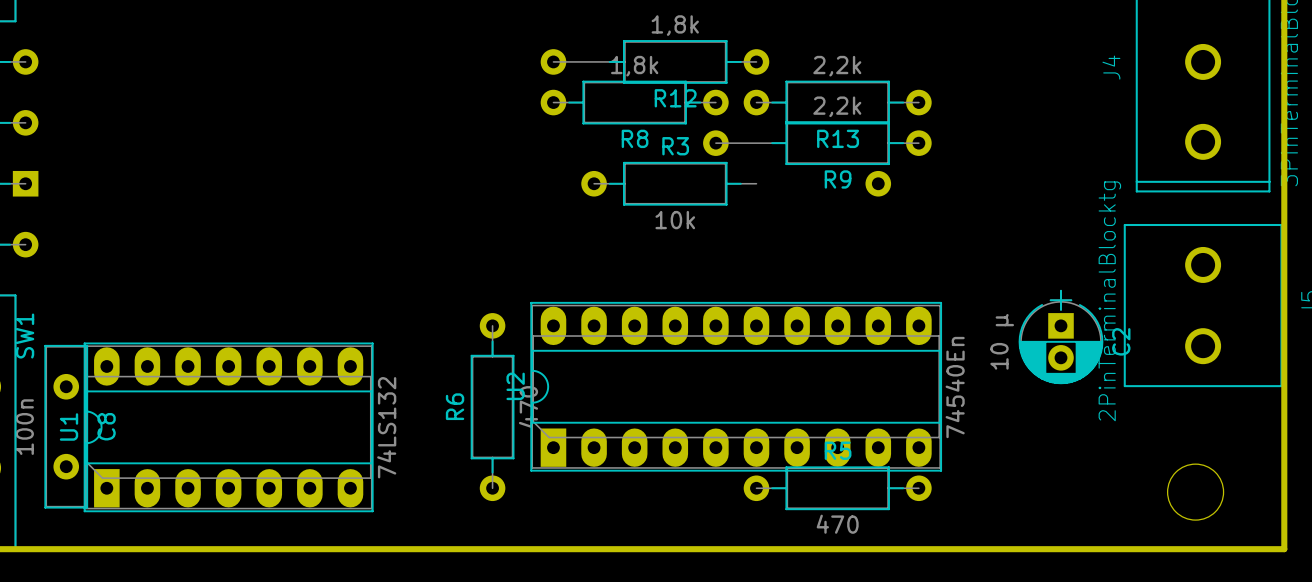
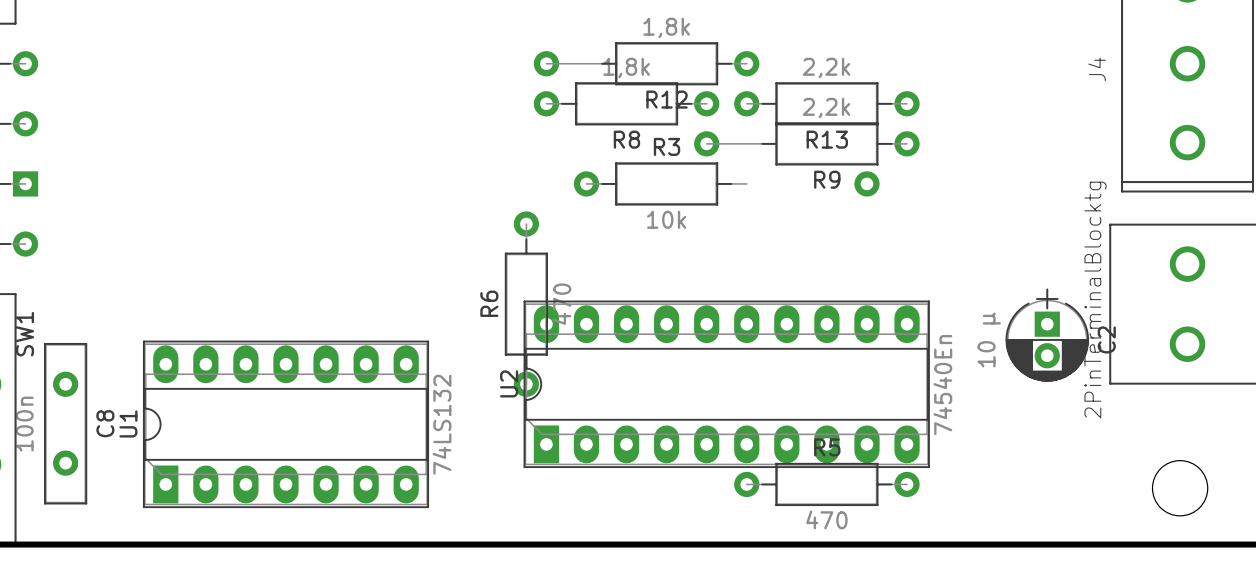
R6 position: (492, 407) -> (526, 304)
U1 position: (228, 427) -> (285, 424)

